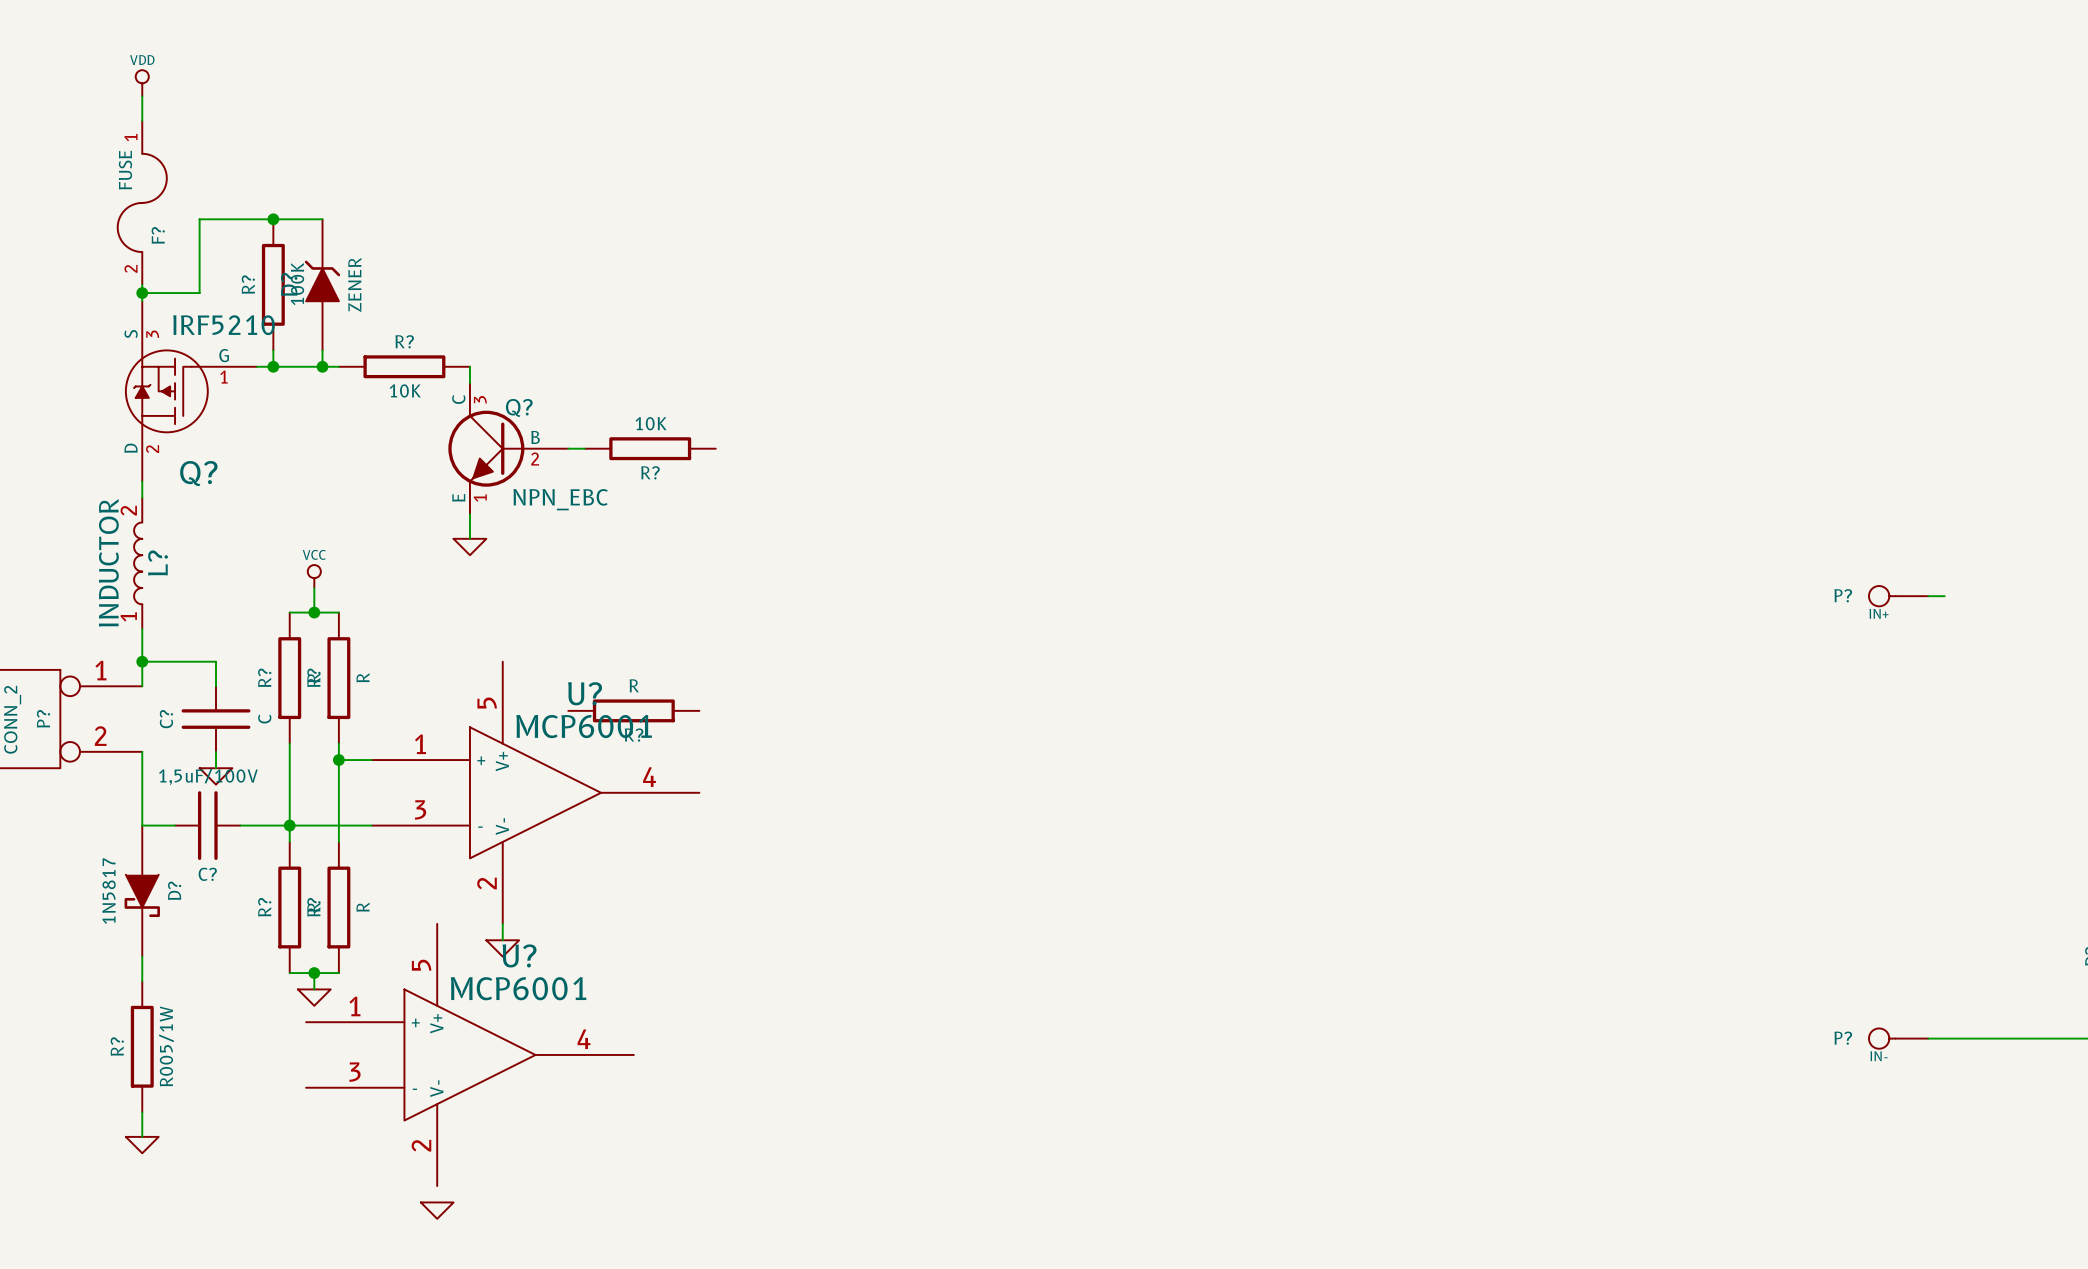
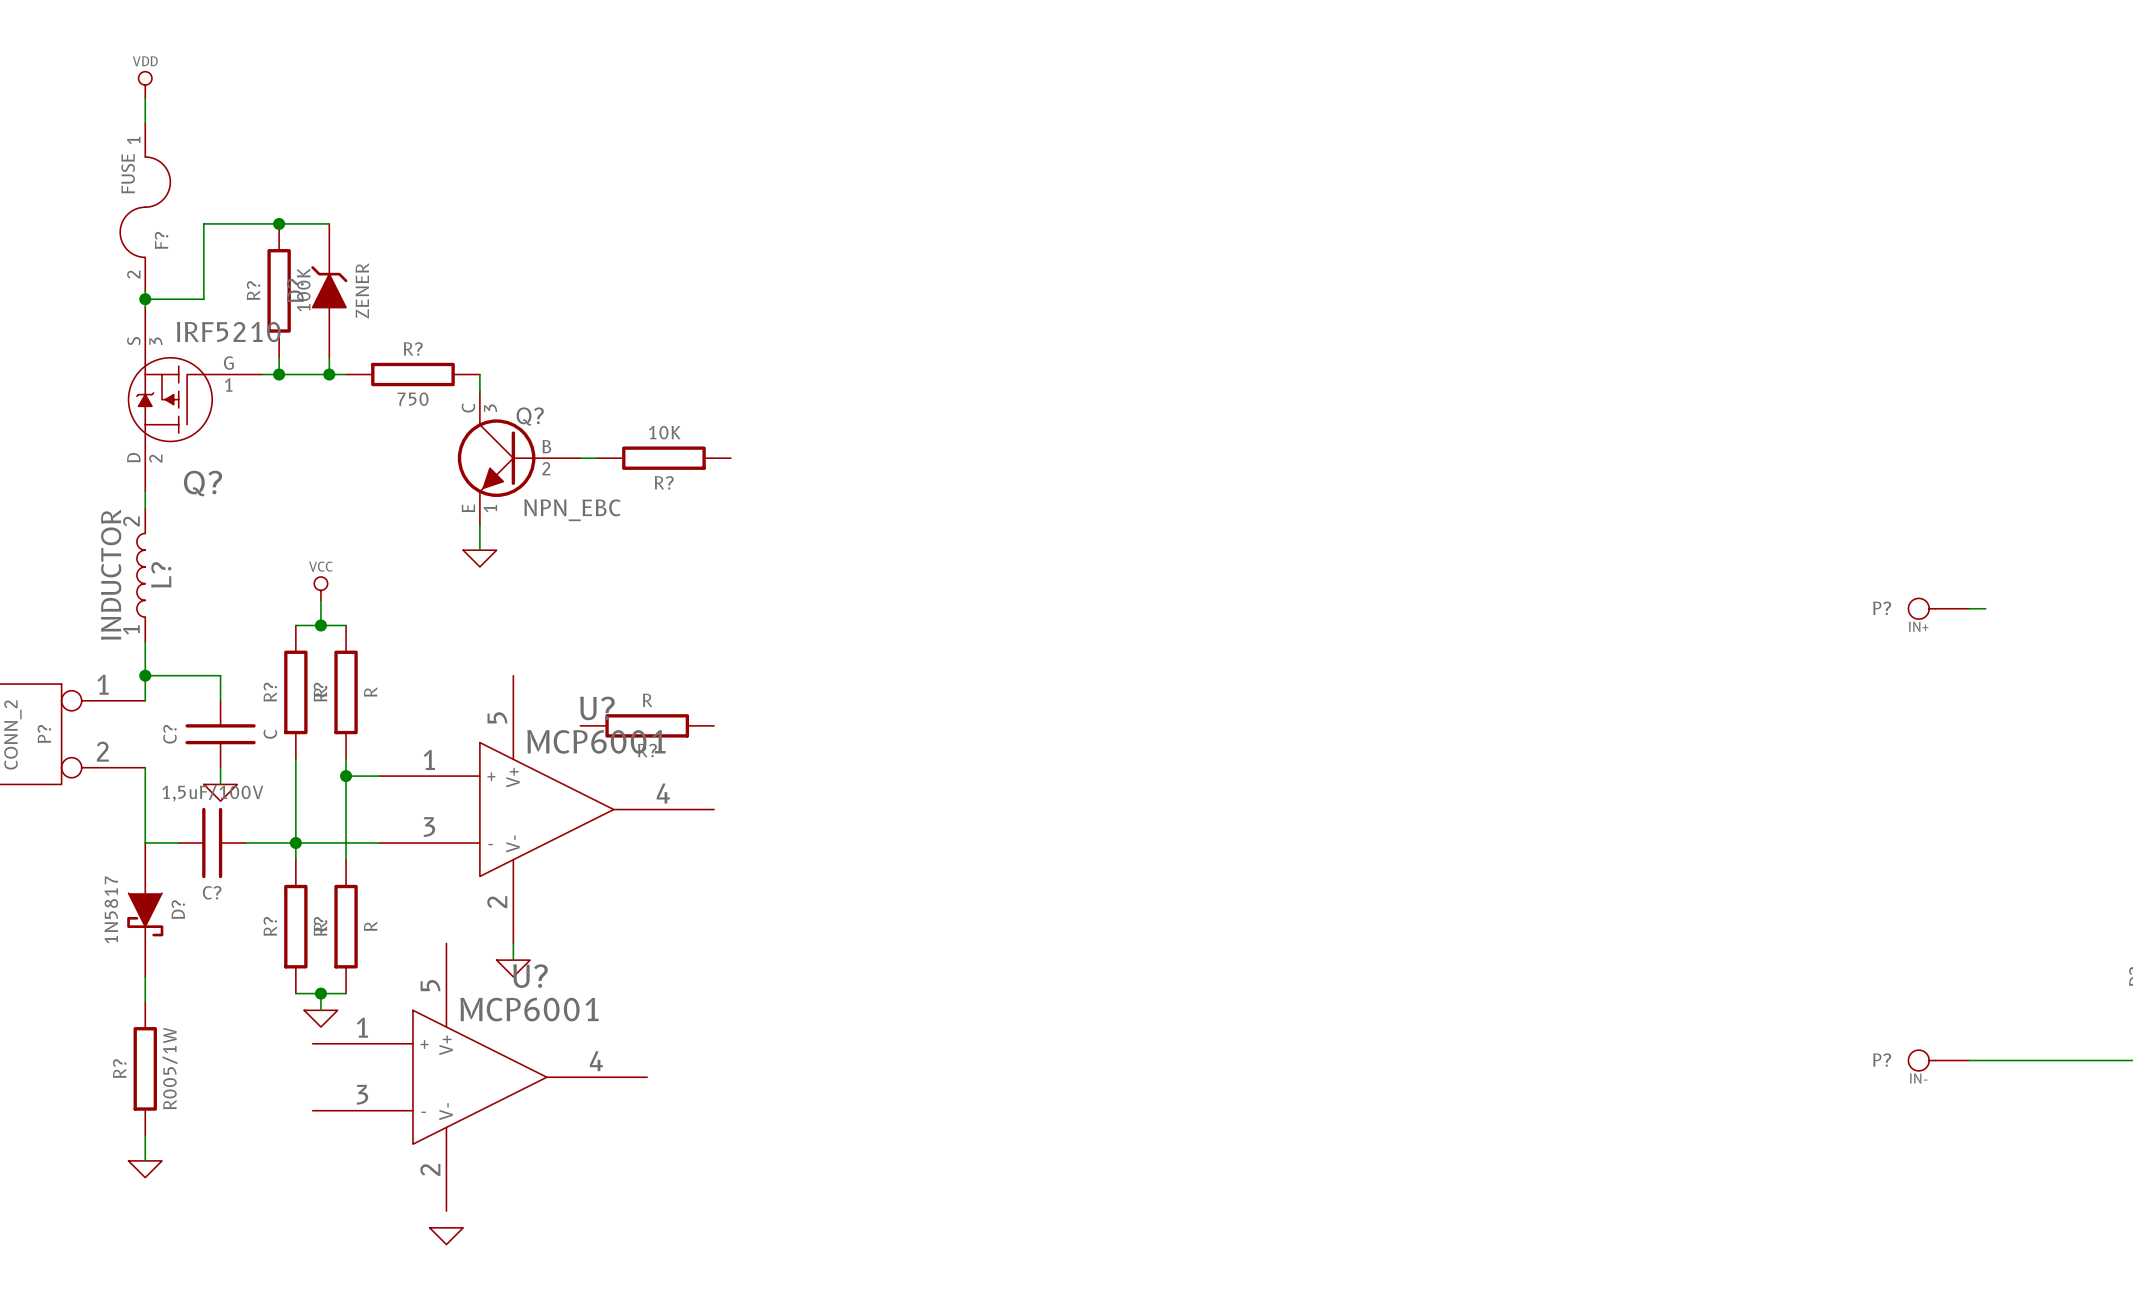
R? value: 10K (405, 390) -> 750 (413, 399)

